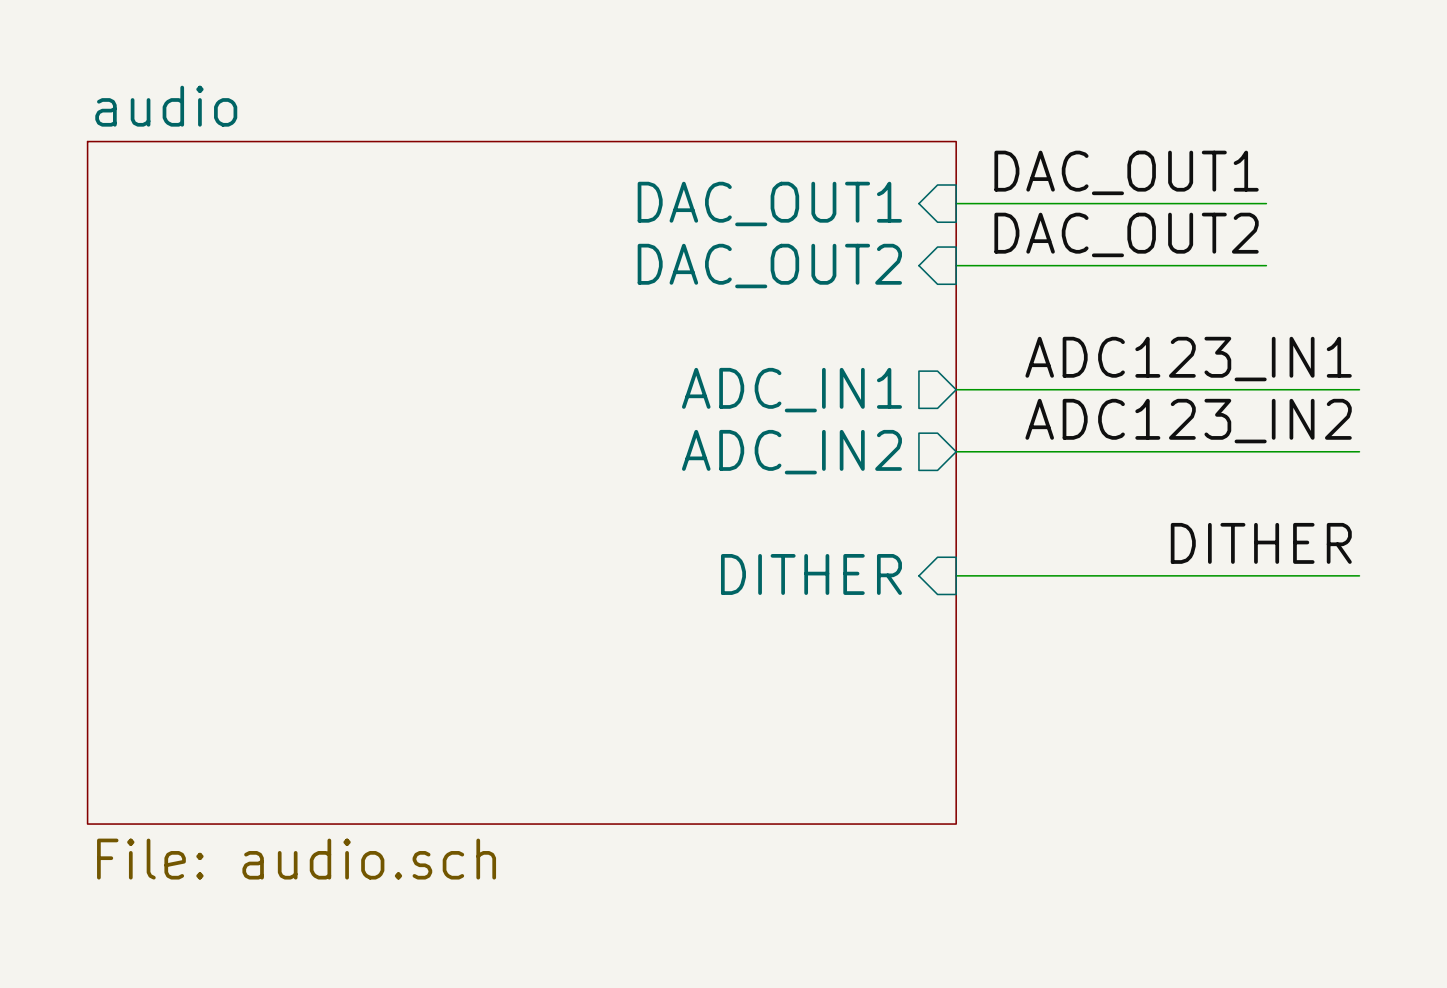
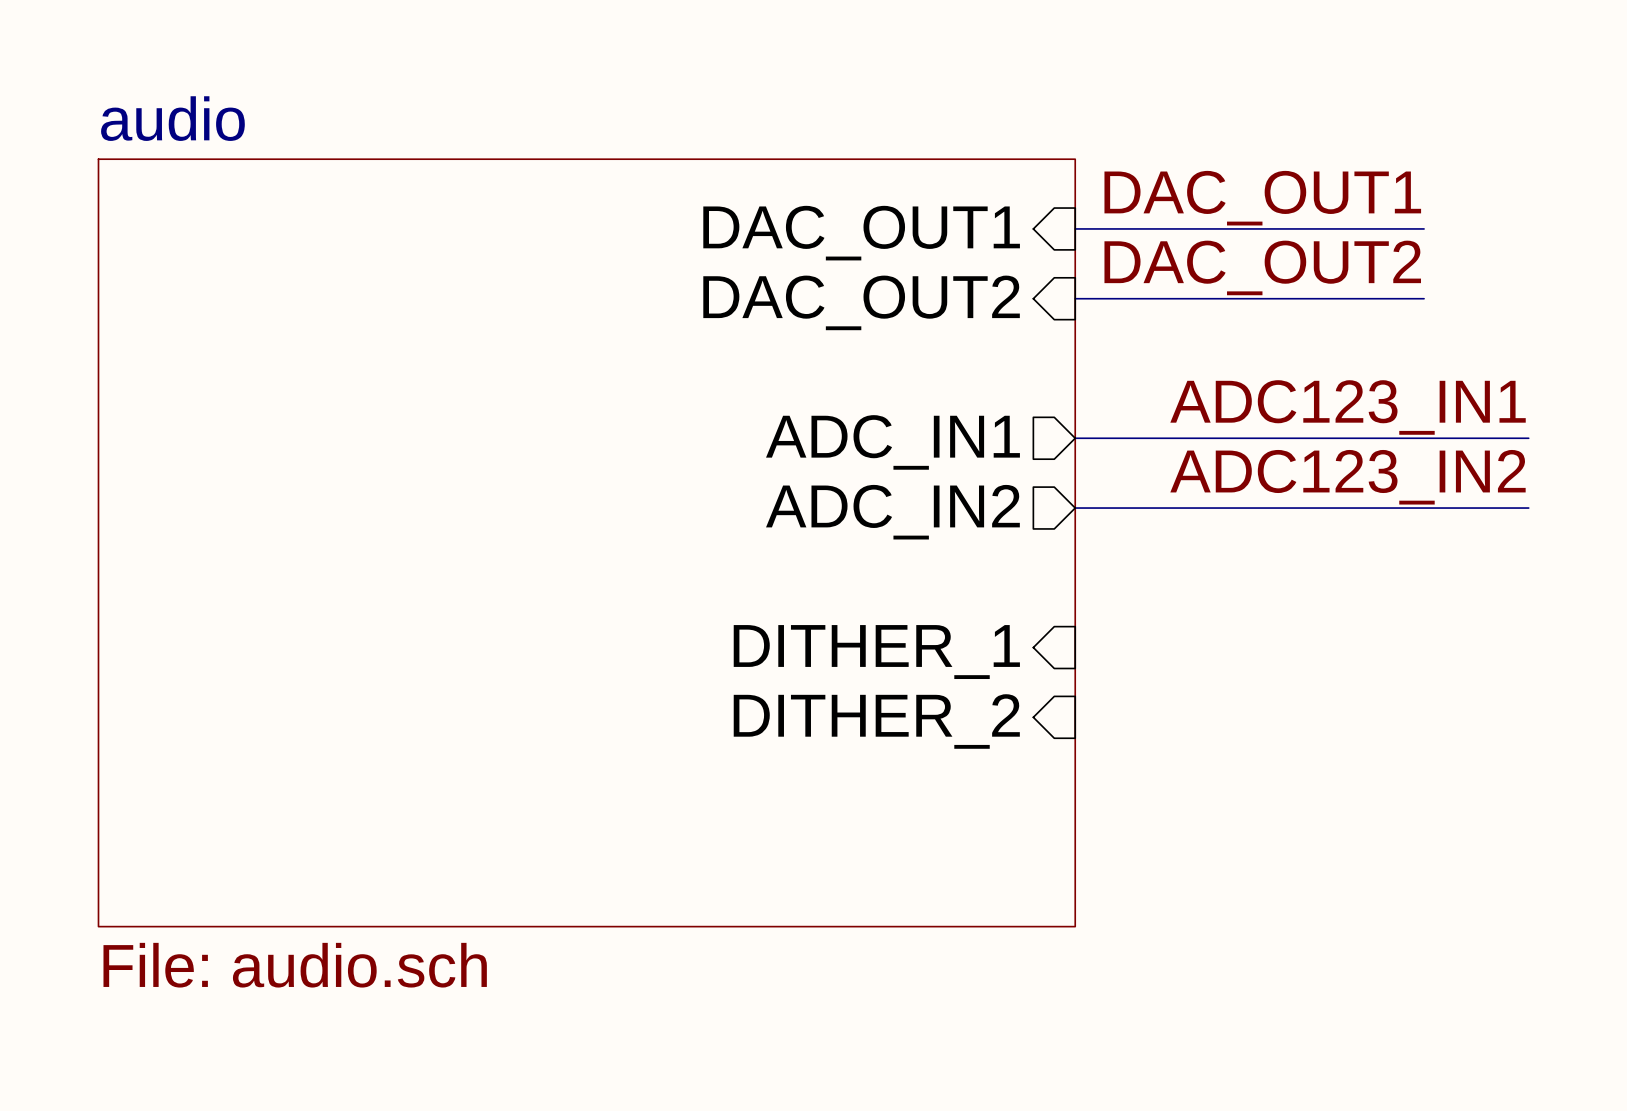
label: DITHER (1261, 543) -> none
sheet pin: DITHER (811, 574) -> DITHER_1 (876, 652)
wire: (956, 575) (1359, 575) -> none
sheet pin: none -> DITHER_2 (876, 721)

